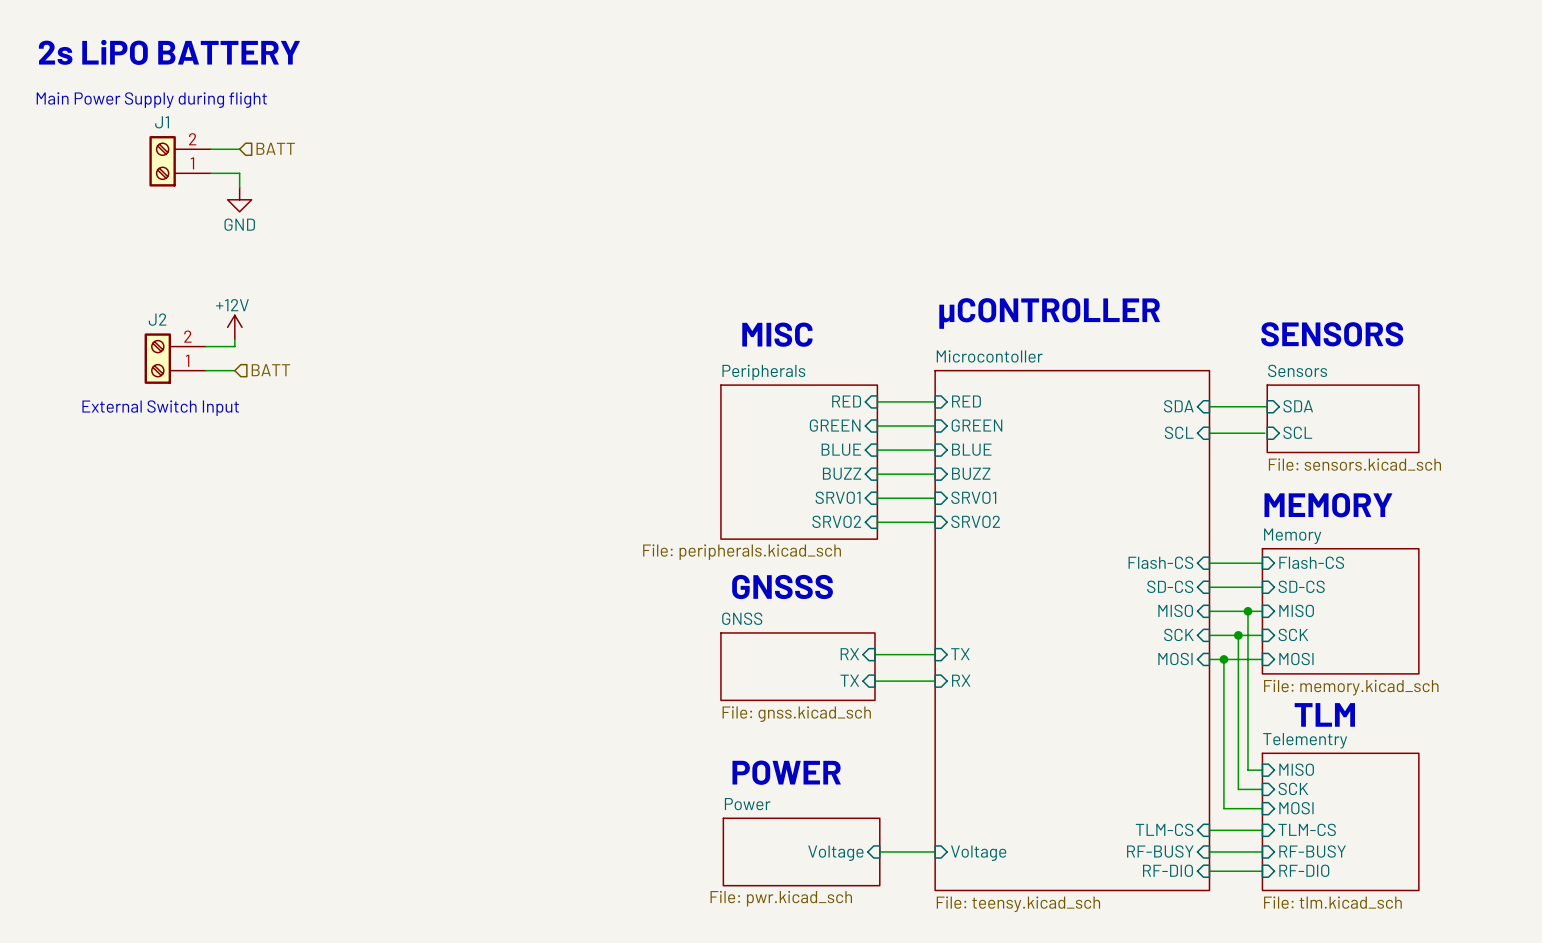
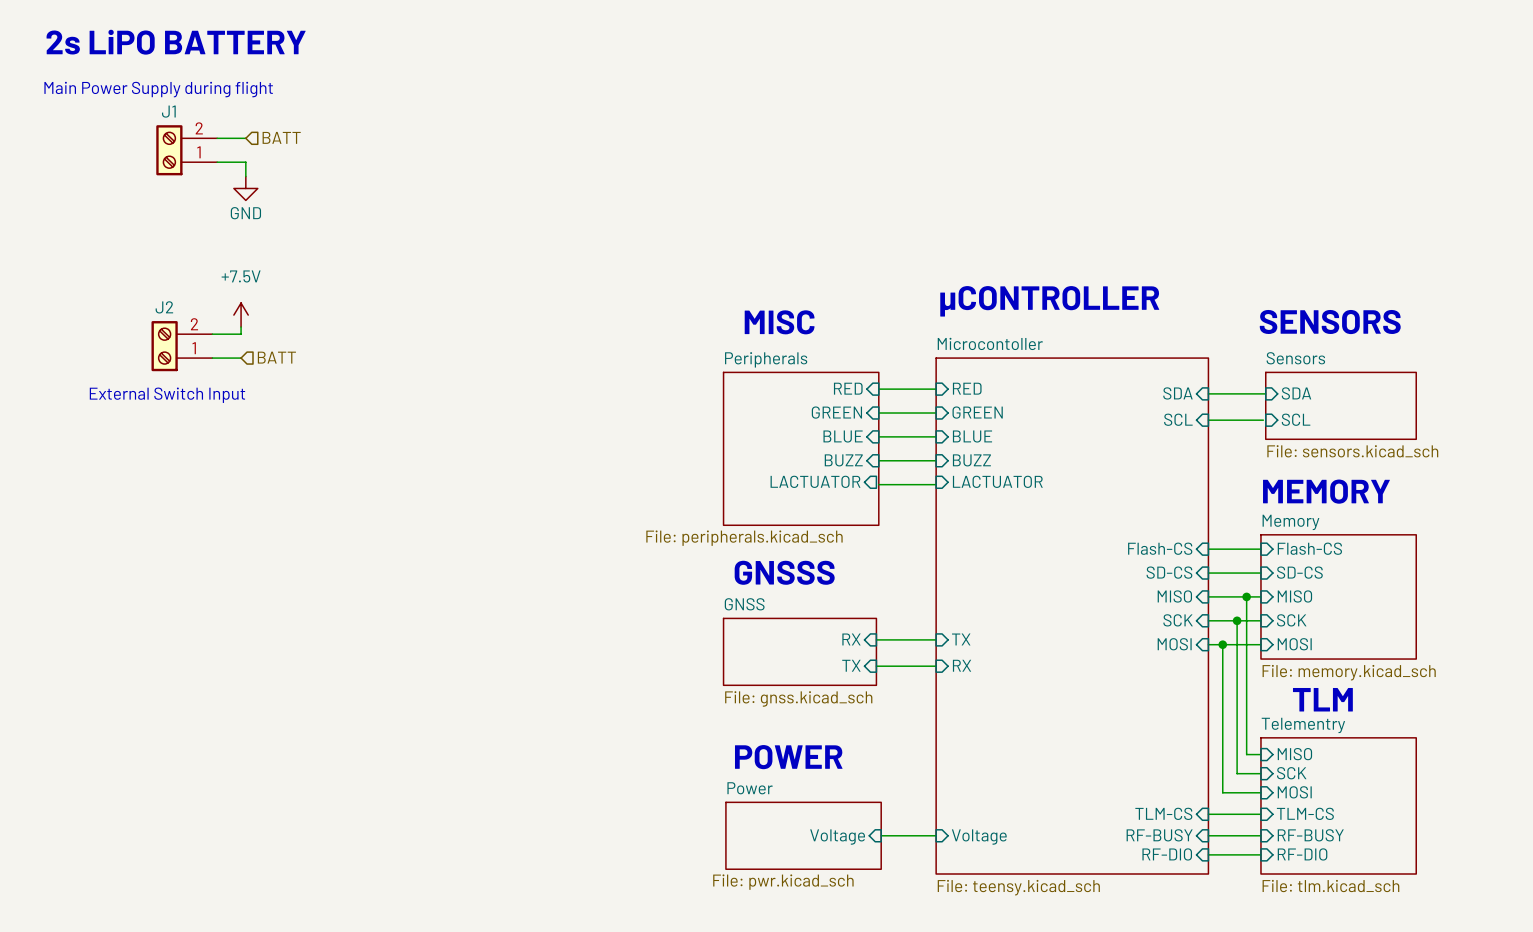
power symbol: +12V (234, 327) -> +7.5V (241, 315)
sheet pin: SRVO1 (838, 497) -> LACTUATOR (815, 481)
sheet pin: SRVO1 (973, 497) -> LACTUATOR (997, 481)
sheet pin: SRVO2 (836, 521) -> none
sheet pin: SRVO2 (975, 521) -> none
wire: (877, 522) (935, 522) -> none

